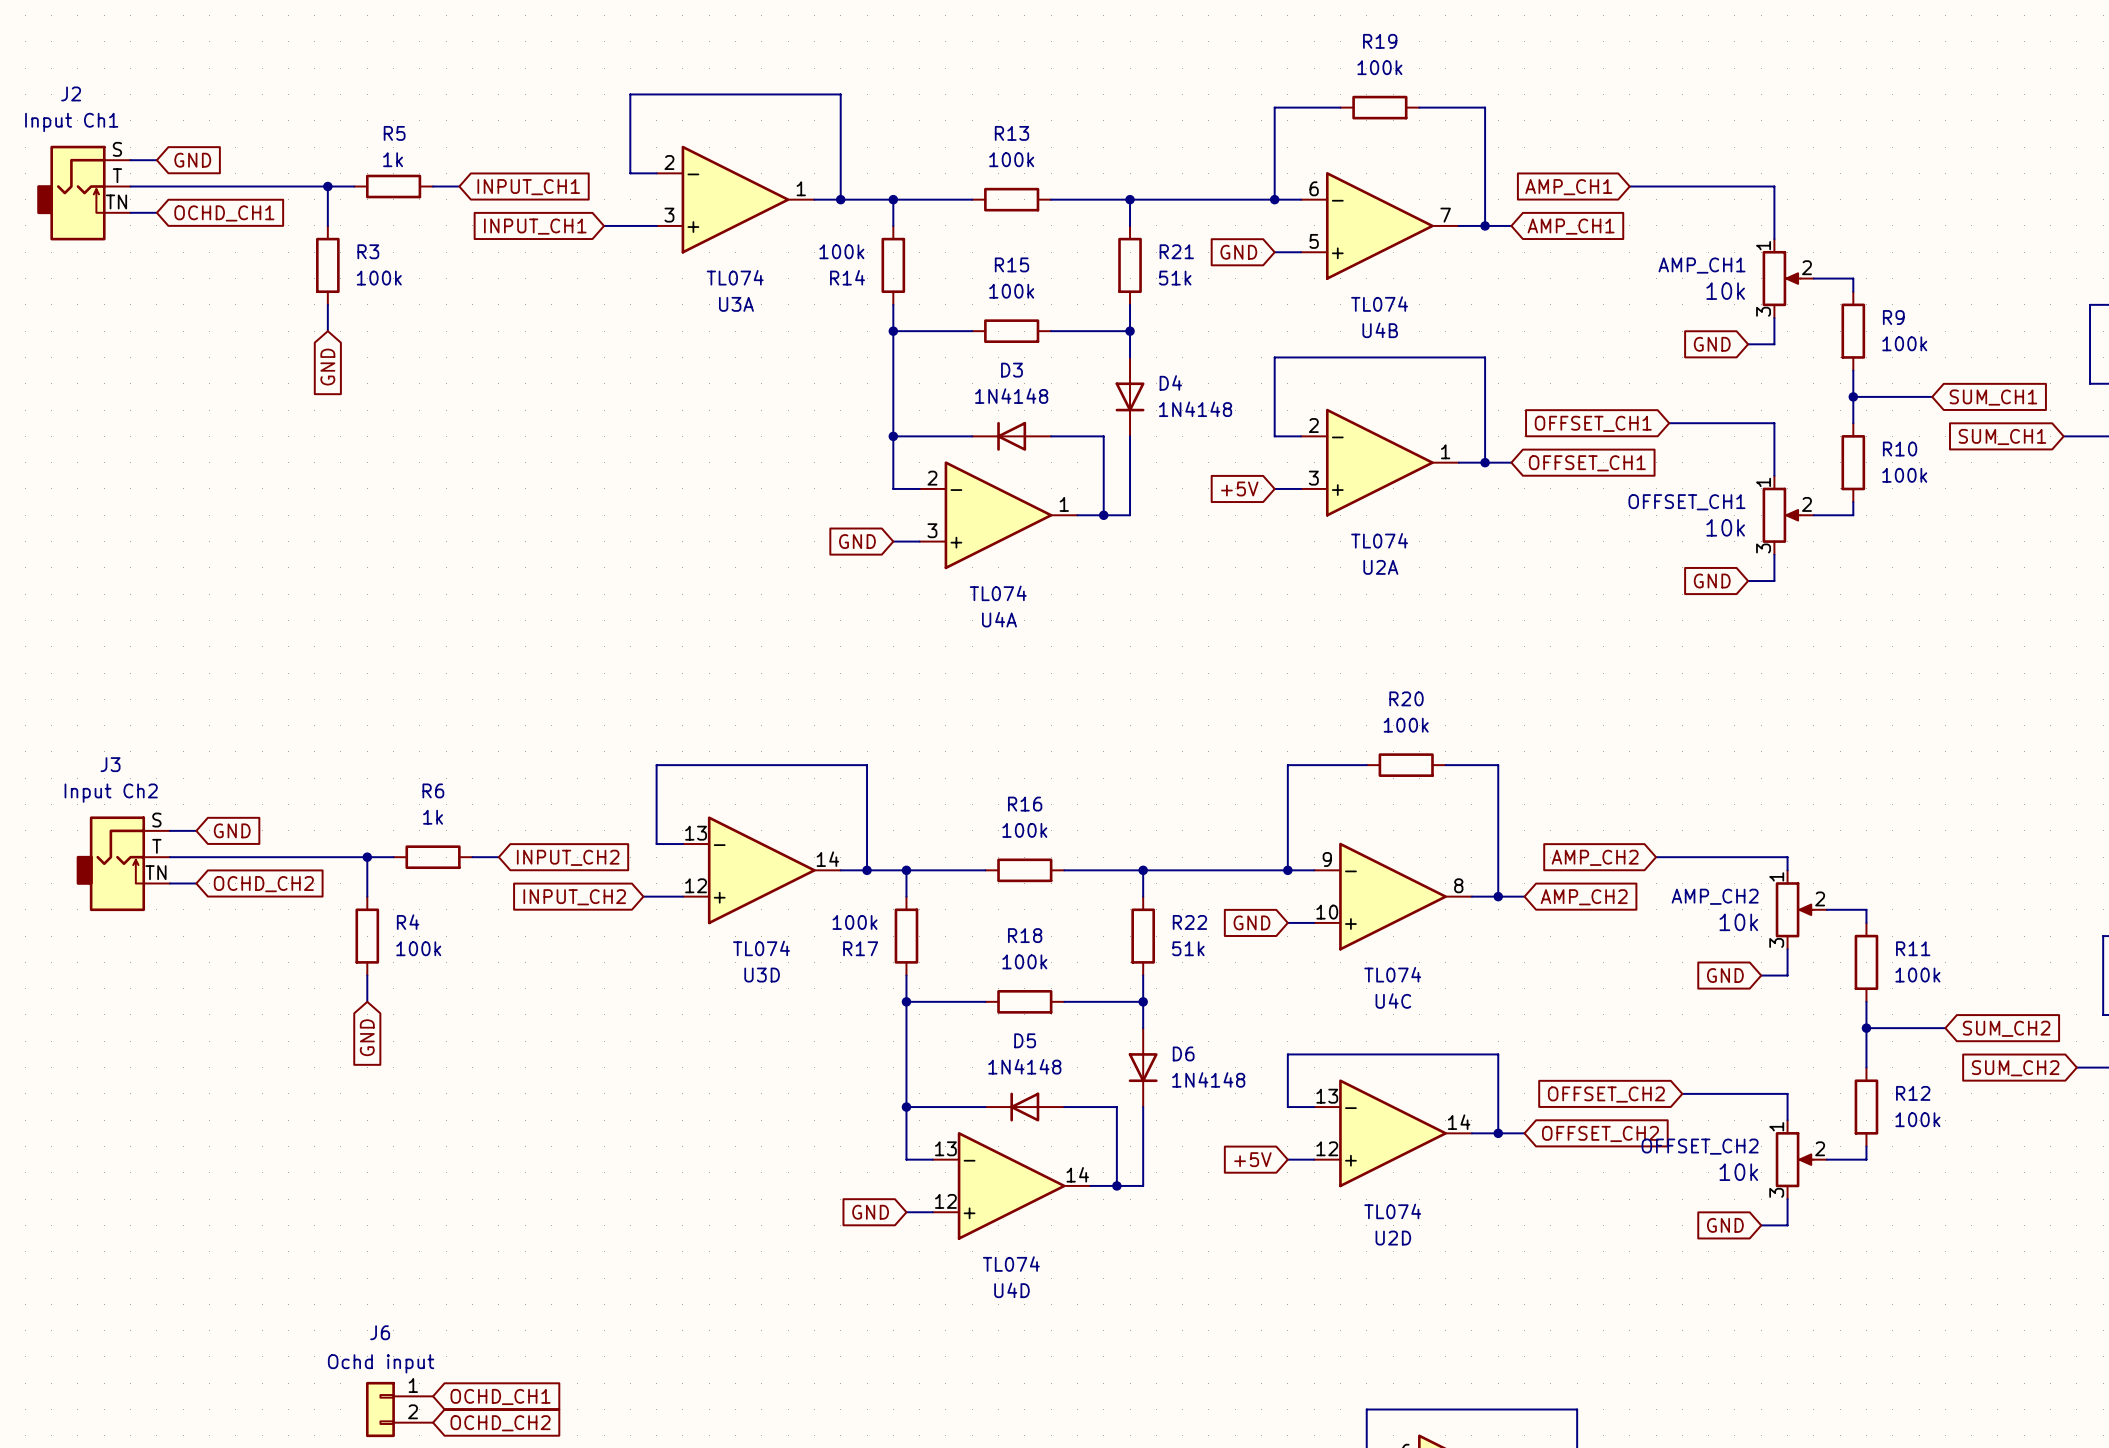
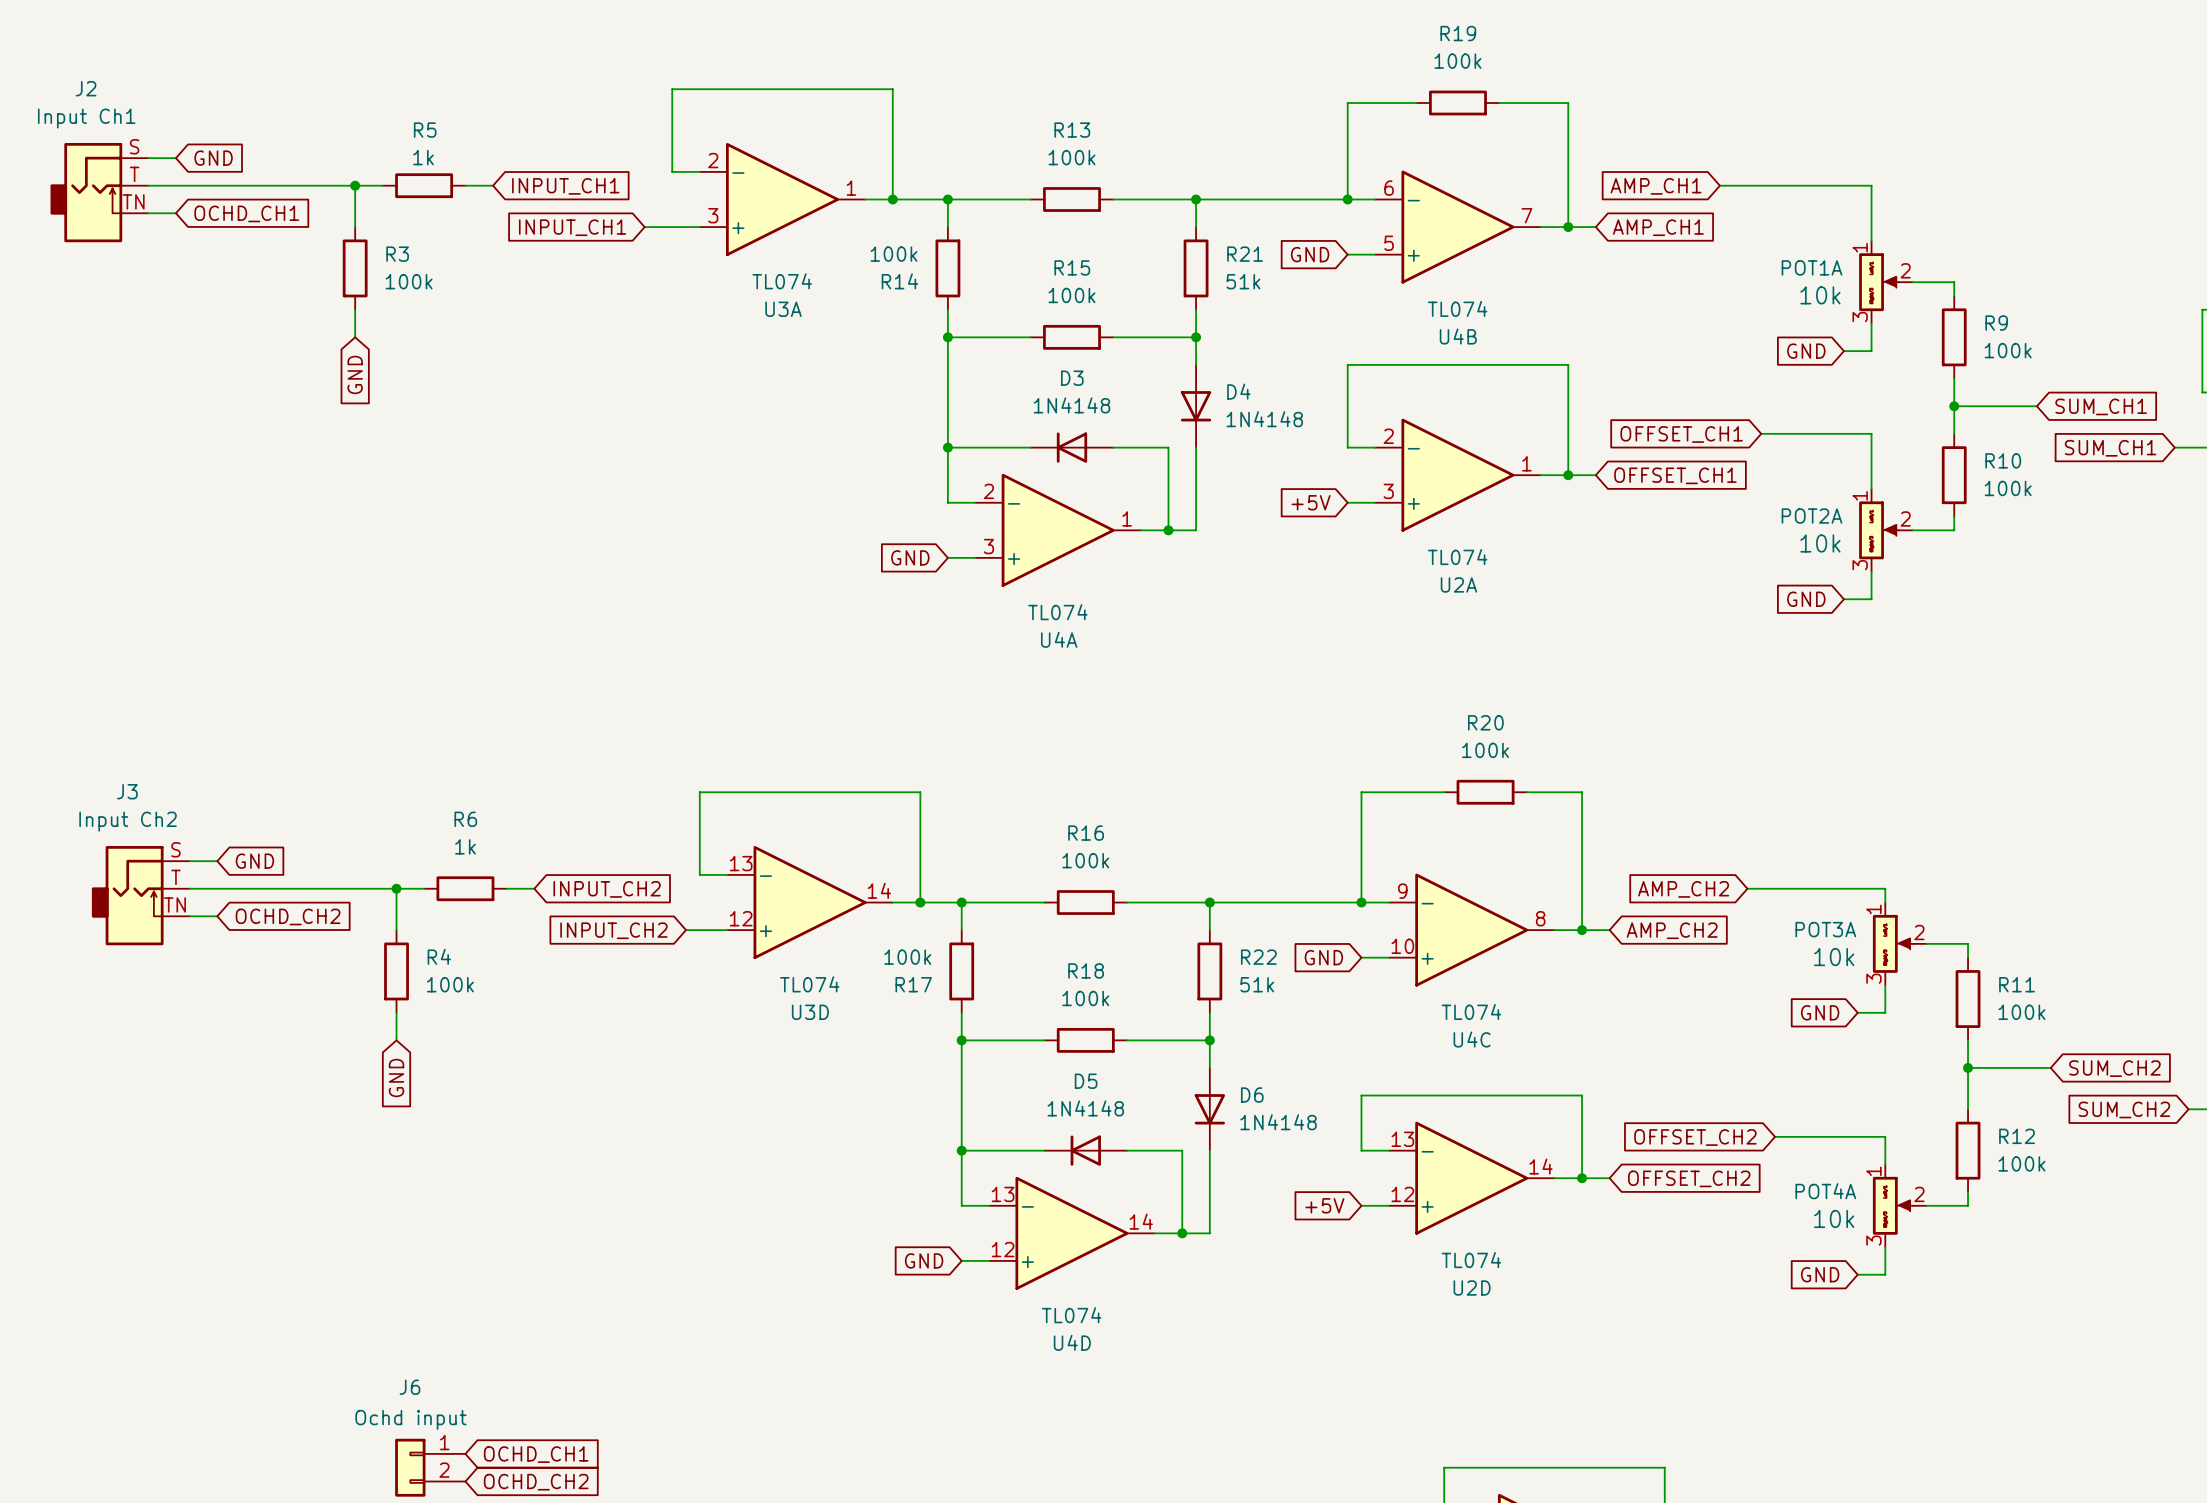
AMP_CH1: (1788, 278) -> none
POT1A: none -> (1886, 282)
OFFSET_CH1: (1788, 515) -> none
POT2A: none -> (1886, 530)
AMP_CH2: (1801, 909) -> none
POT3A: none -> (1899, 943)
OFFSET_CH2: (1801, 1159) -> none
POT4A: none -> (1899, 1205)

